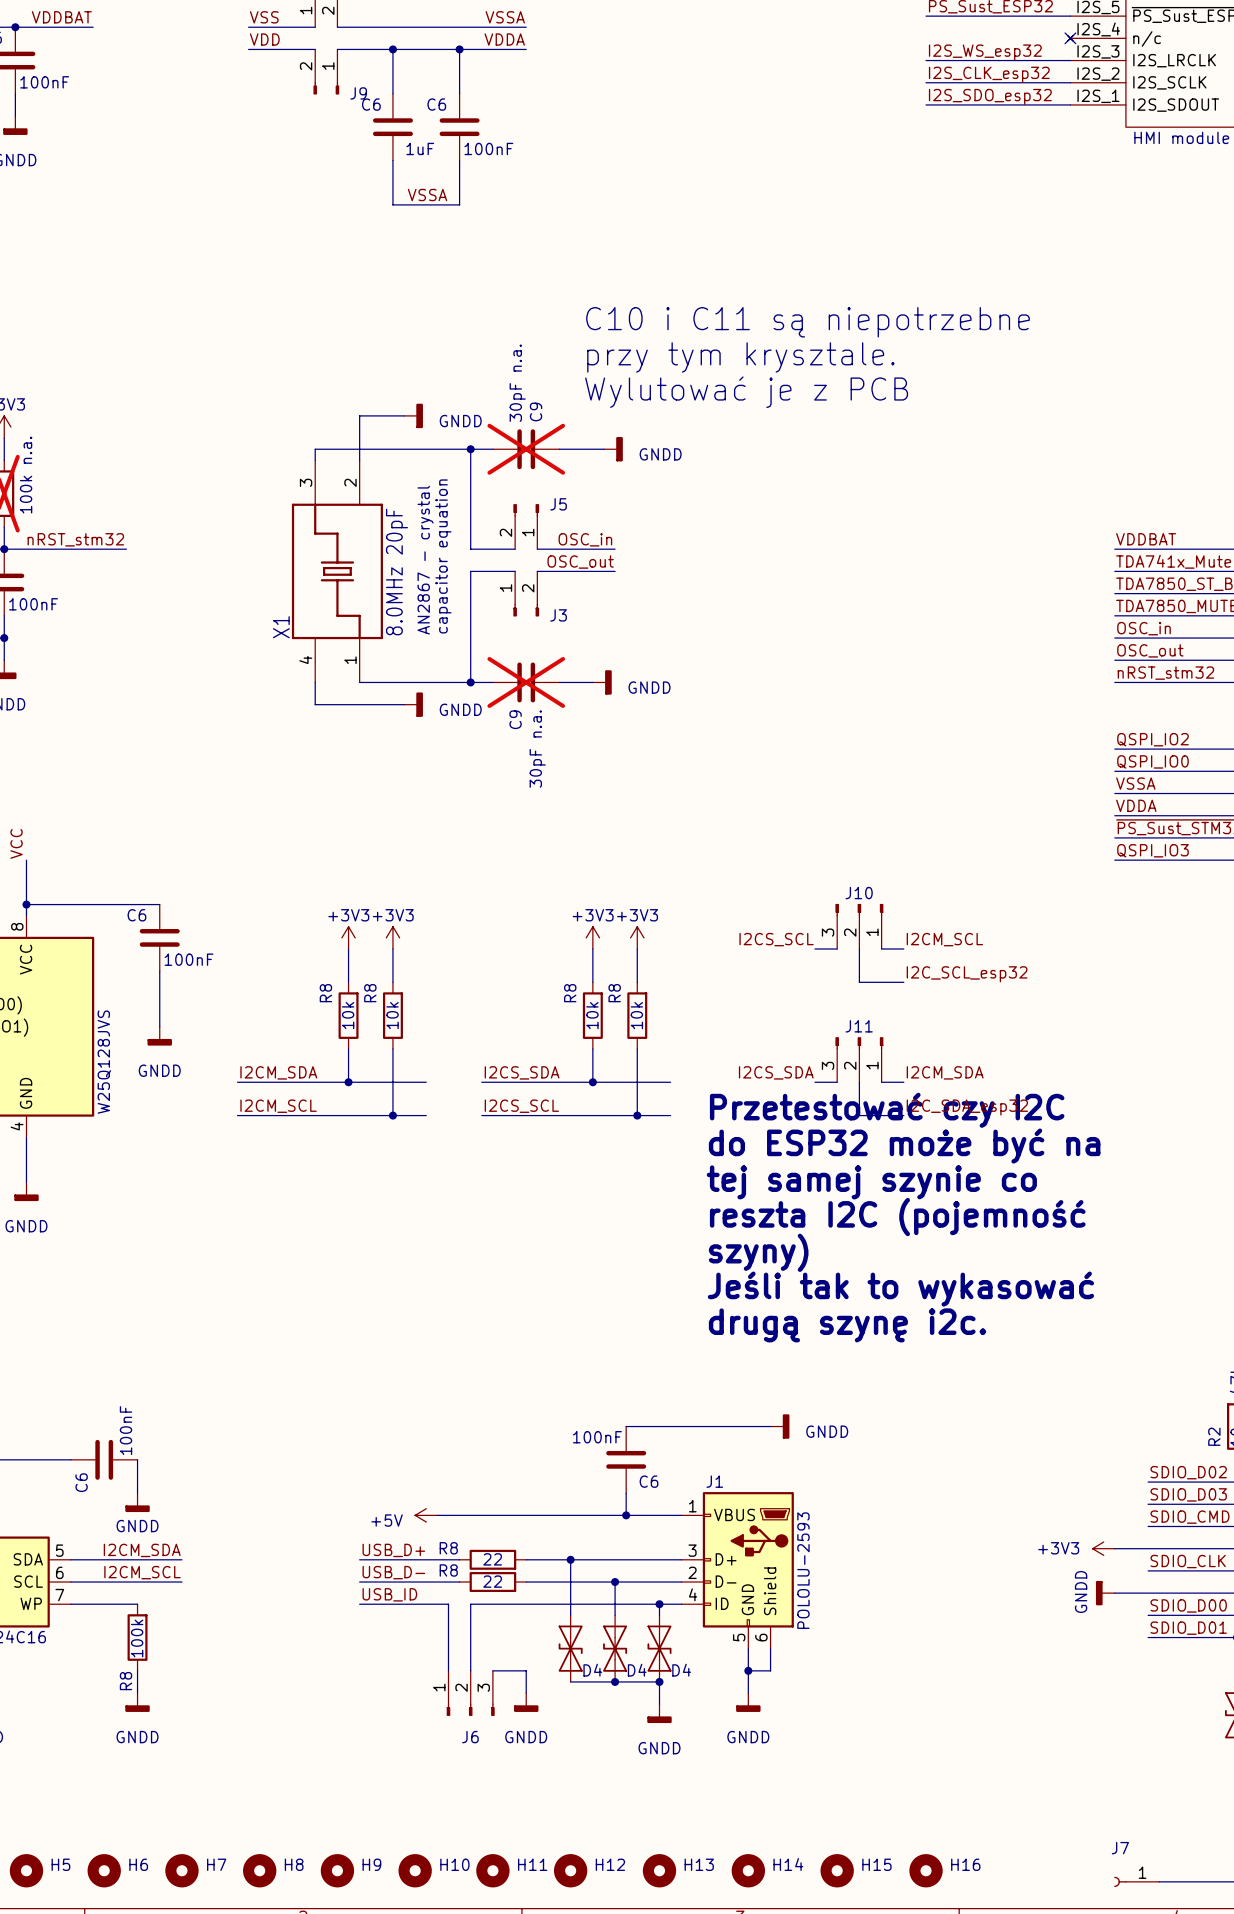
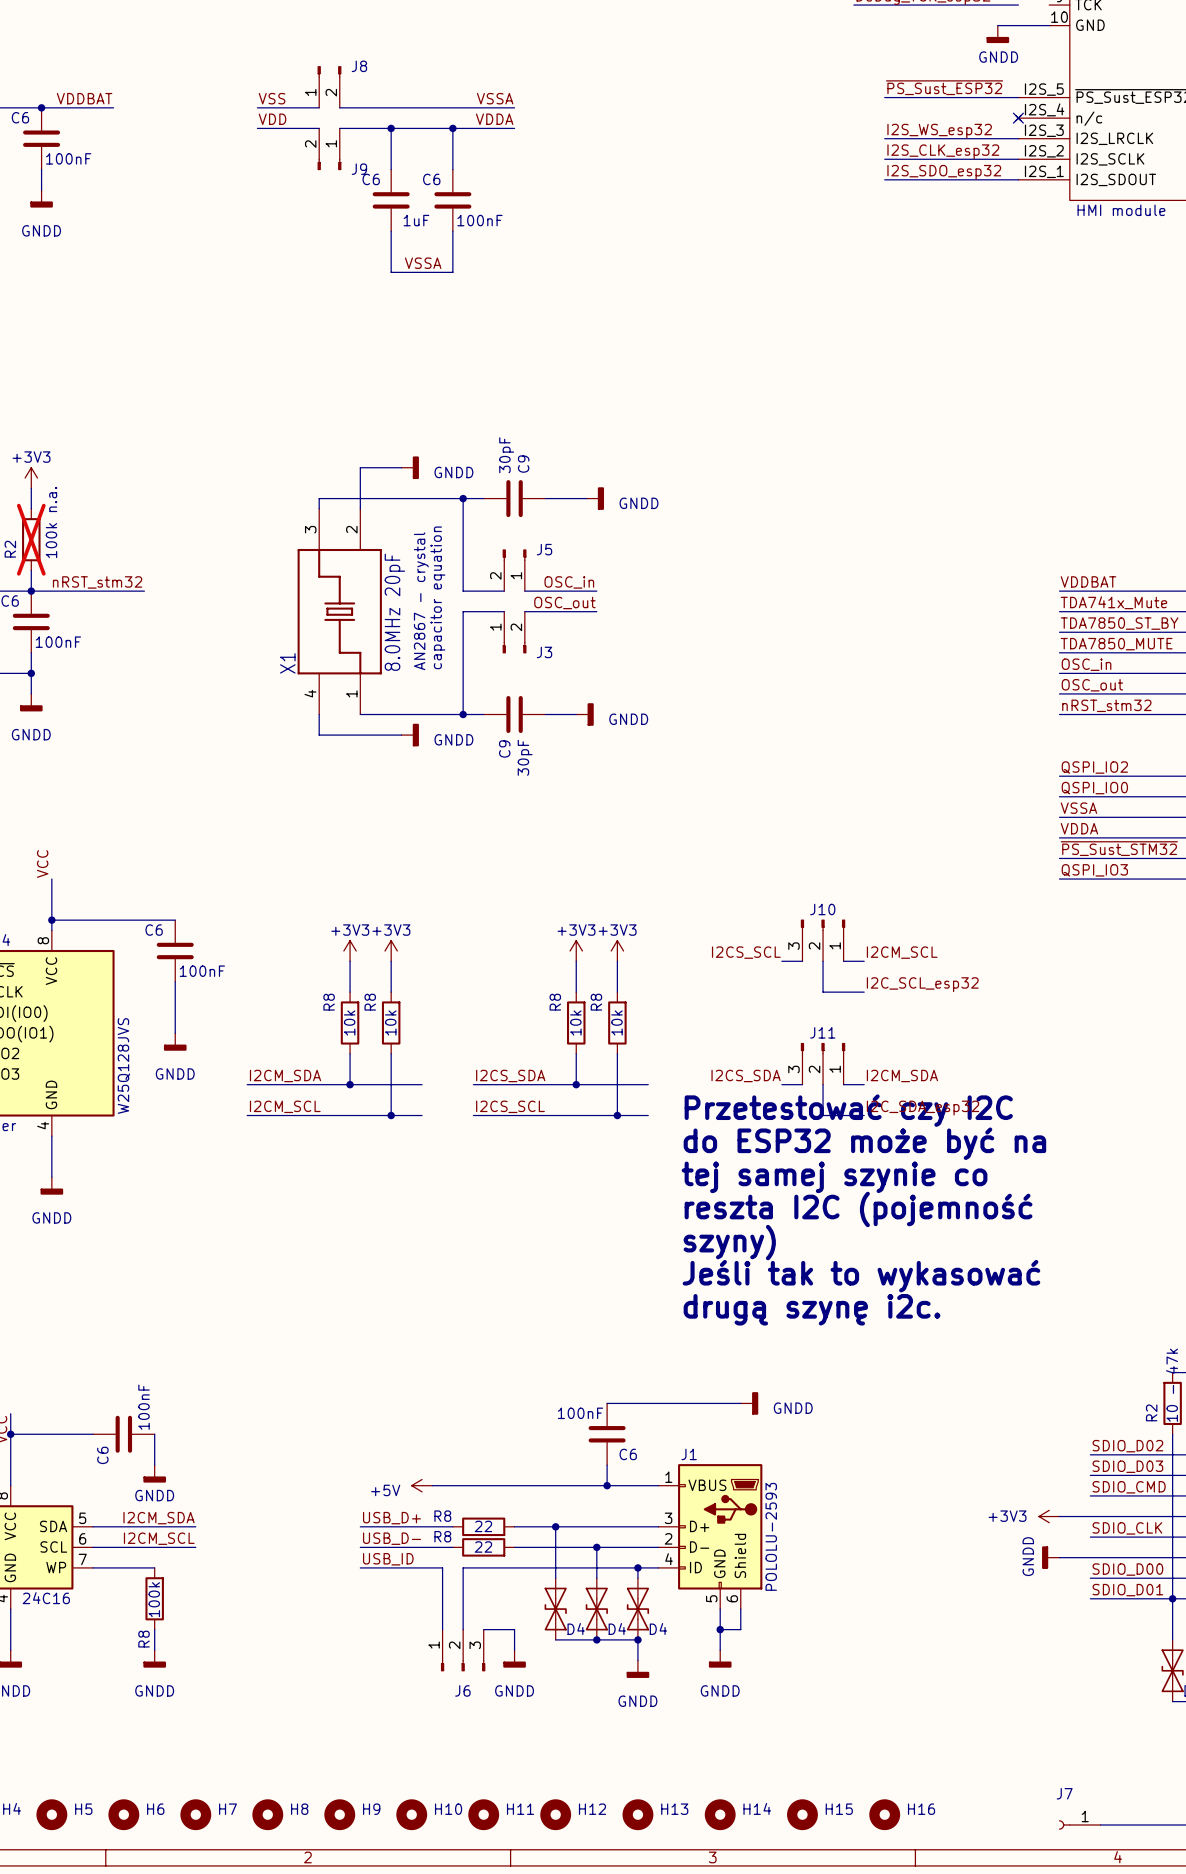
text: C10 i C11 są niepotrzebne (808, 322) -> none
text: przy tym krysztale. (740, 357) -> none
C9 value: 30pF n.a. (517, 383) -> 30pF (506, 455)
text: Wylutować je z PCB (746, 392) -> none
C9 do-not-place cross: (526, 449) -> none
C9 do-not-place cross: (526, 682) -> none
C9 value: 30pF n.a. (537, 749) -> 30pF (525, 757)

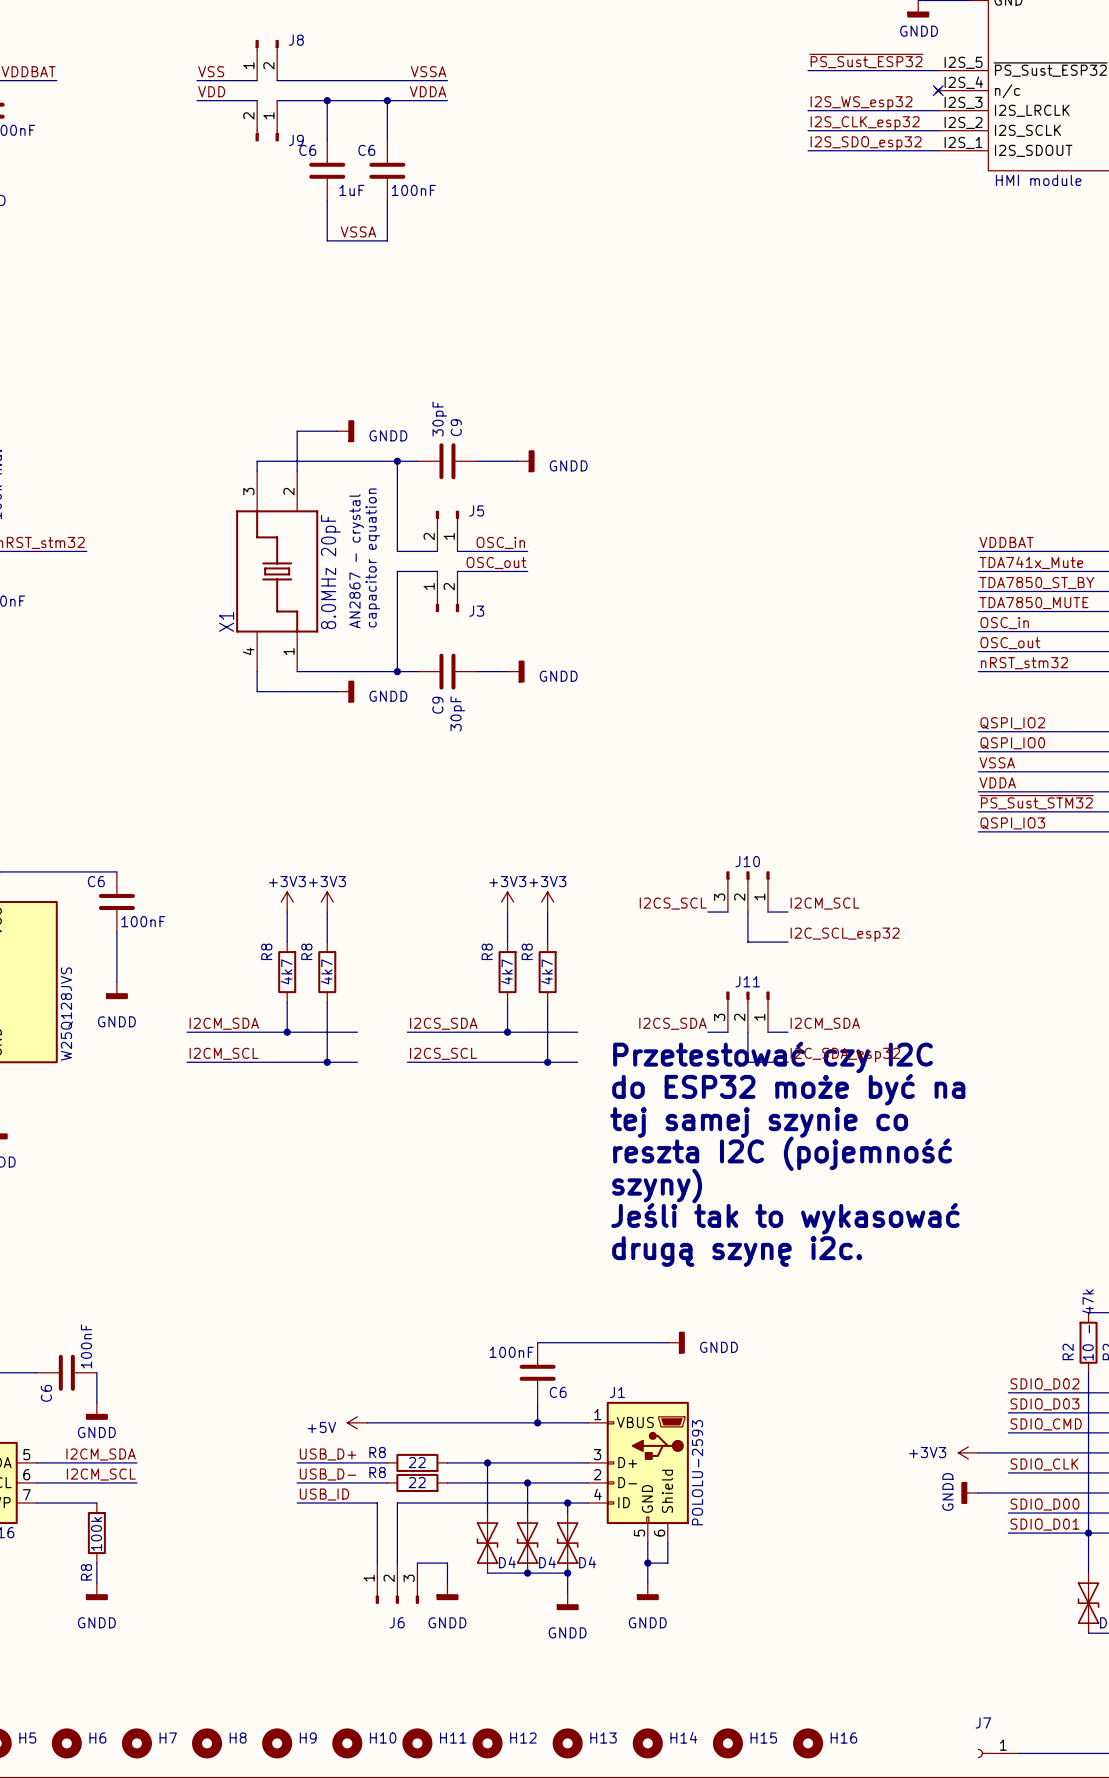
R8 value: 10k (349, 1022) -> 4k7 (286, 971)
R8 value: 10k (390, 1022) -> 4k7 (326, 971)
R8 value: 10k (575, 1022) -> 4k7 (506, 971)
R8 value: 10k (617, 1022) -> 4k7 (547, 971)

